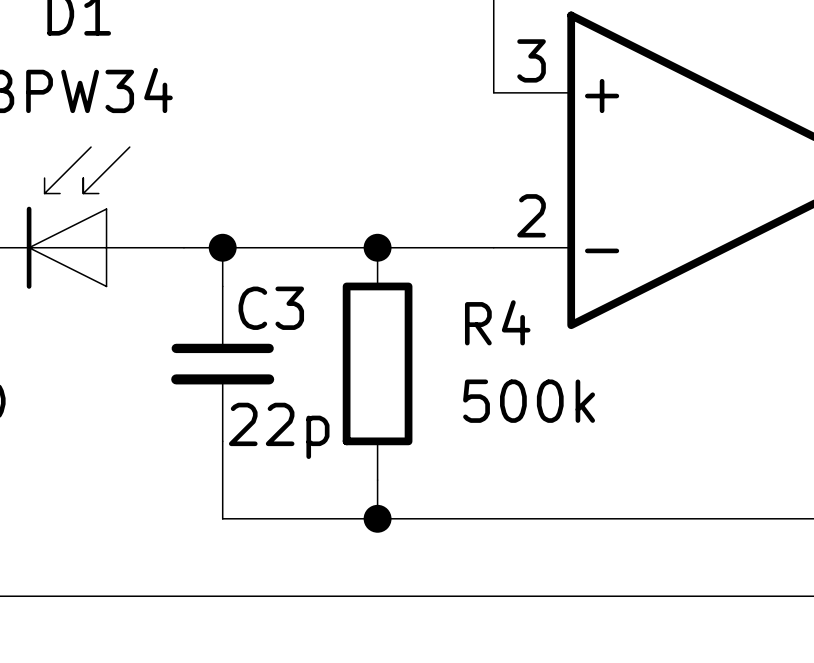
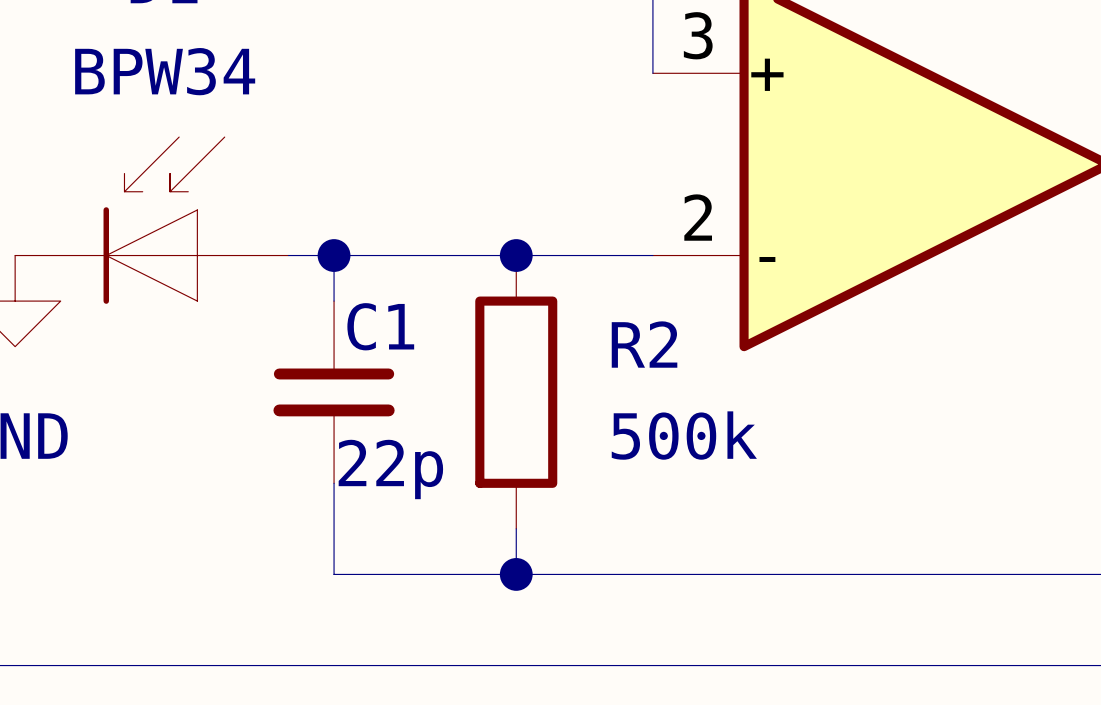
C3 name: C3 (271, 308) -> C1 (380, 326)
R4 name: R4 (497, 322) -> R2 (644, 344)

